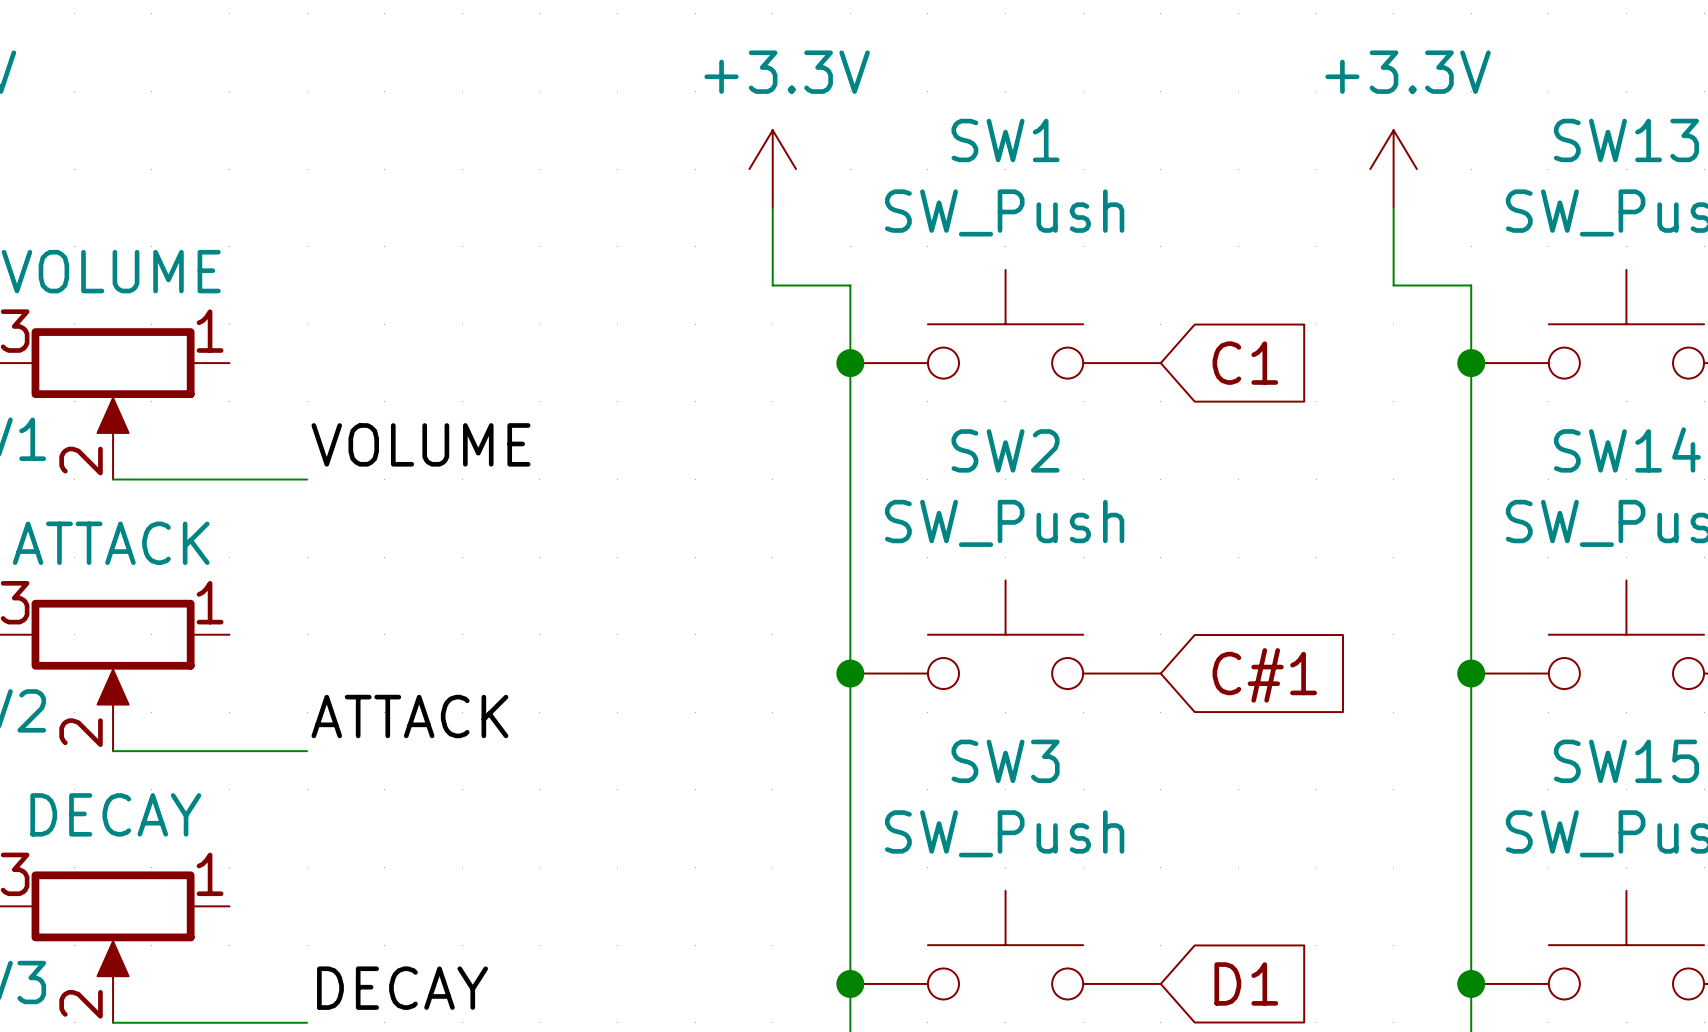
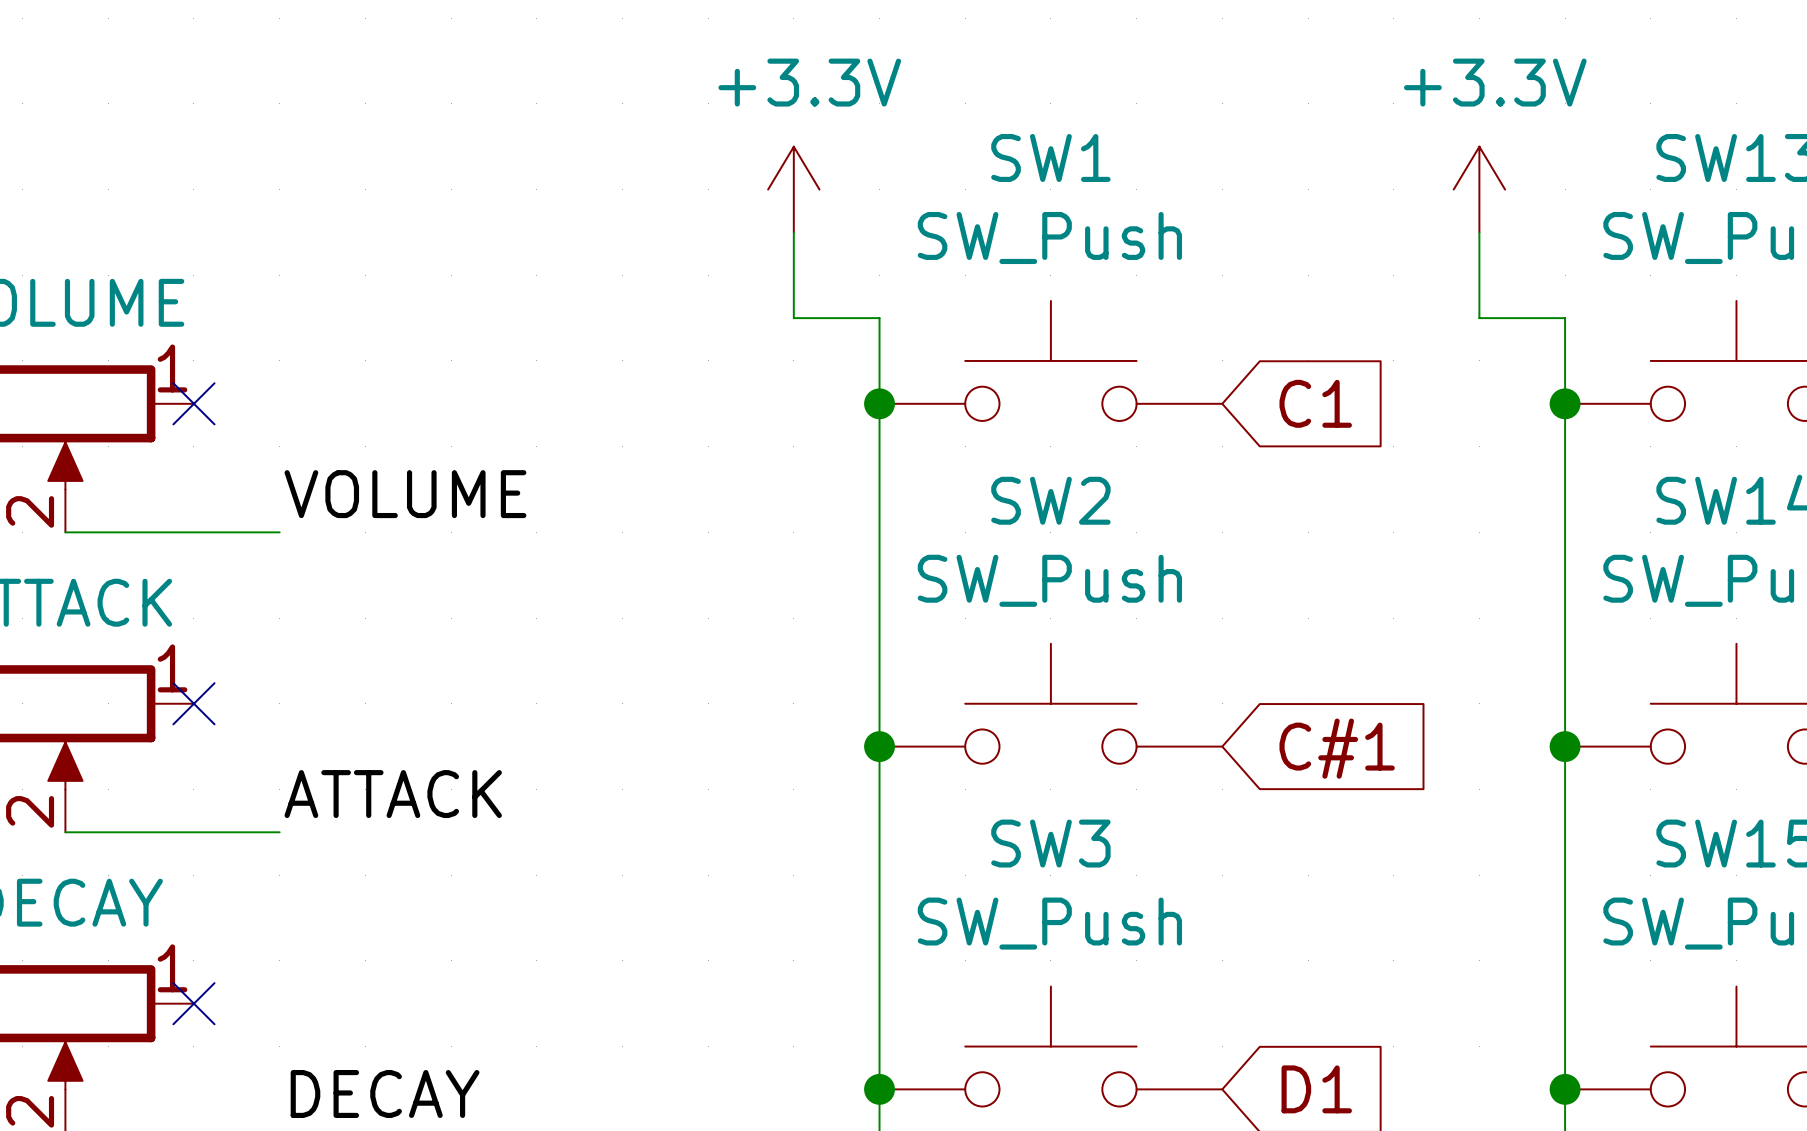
no-connect mark: none -> (193, 403)
no-connect mark: none -> (193, 703)
no-connect mark: none -> (193, 1003)

